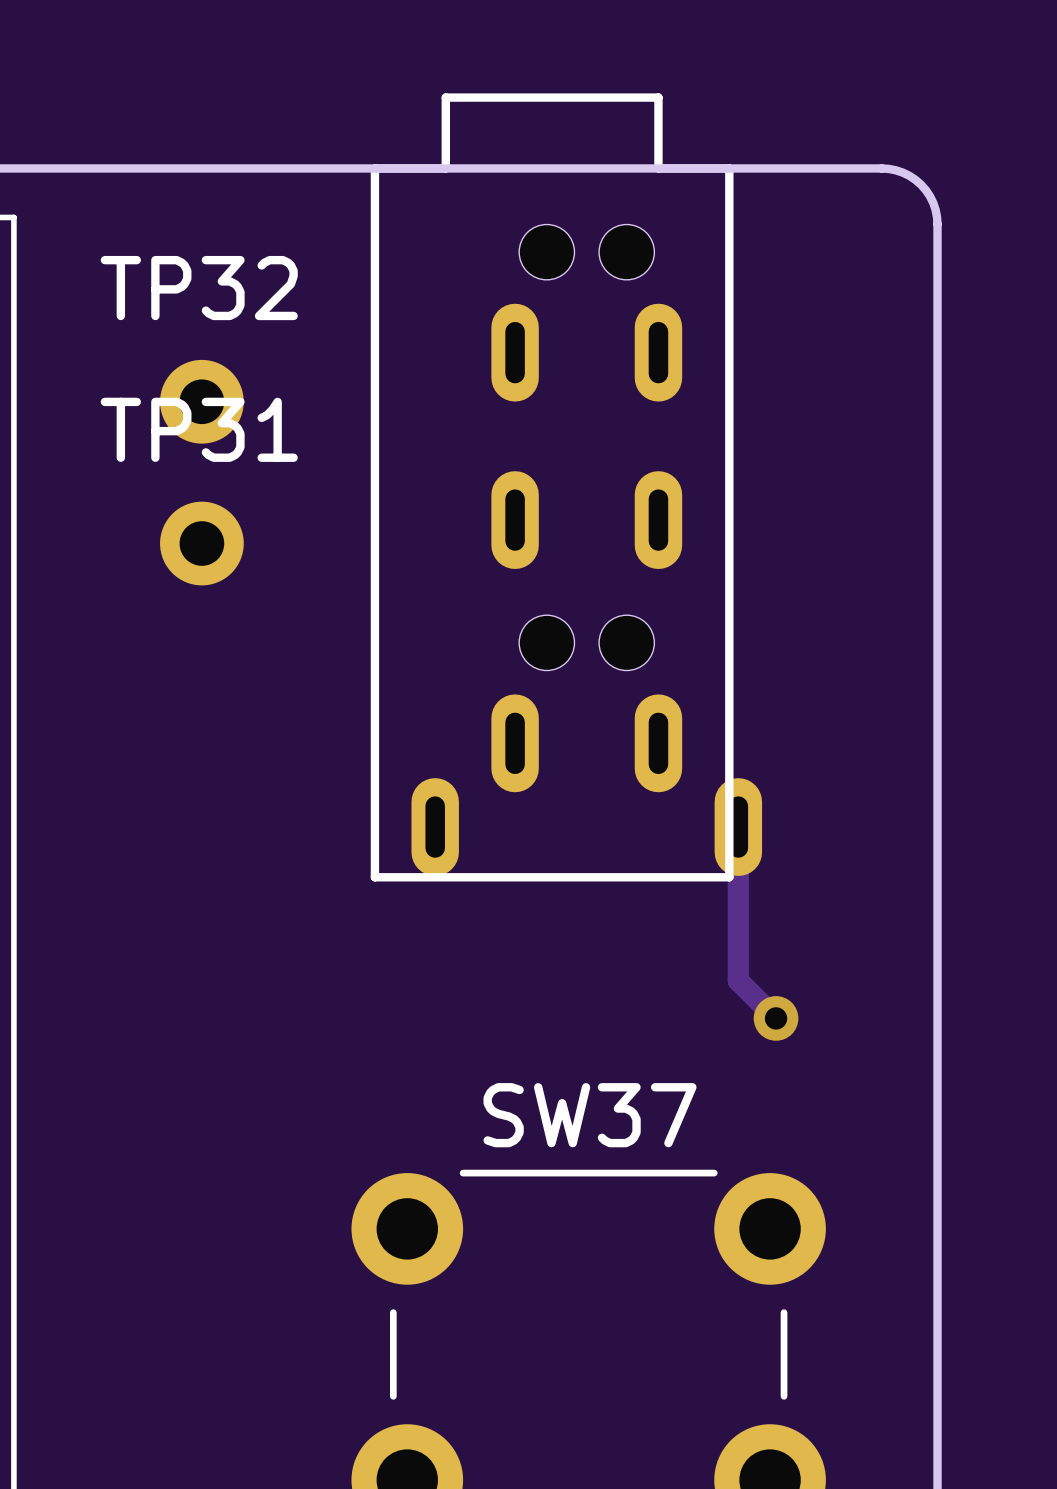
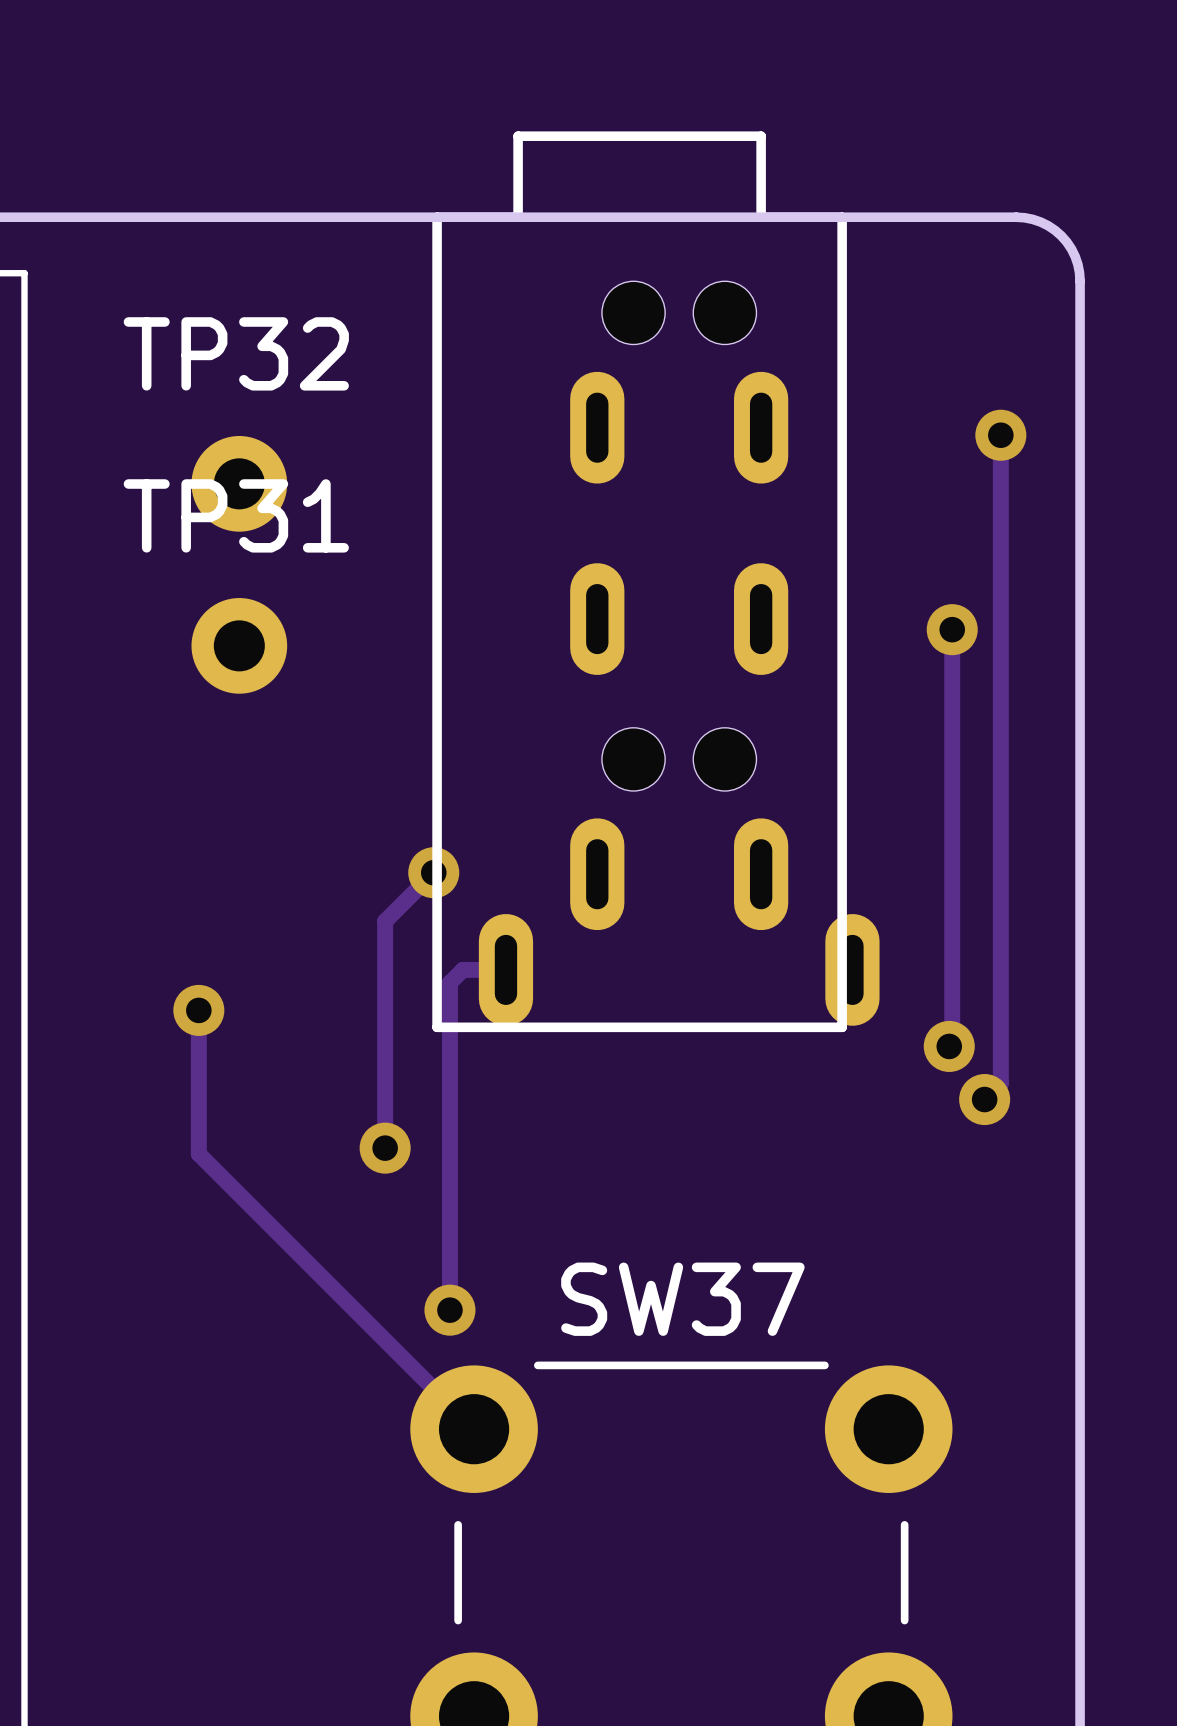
track: none -> (1000, 435) (1000, 1083) (984, 1099)
via: none -> (1000, 435)
track: none -> (952, 629) (952, 1043) (949, 1046)
via: none -> (952, 629)
track: none -> (433, 872) (385, 921) (385, 1148)
via: none -> (433, 872)
track: none -> (505, 969) (462, 969) (449, 982) (449, 1310)
track: (738, 827) (738, 980) (776, 1018) -> none
track: none -> (198, 1010) (198, 1153) (474, 1429)
via: none -> (198, 1010)
via: none -> (949, 1046)
via: none -> (984, 1099)
via: none -> (385, 1148)
via: (776, 1018) -> none
via: none -> (449, 1310)

